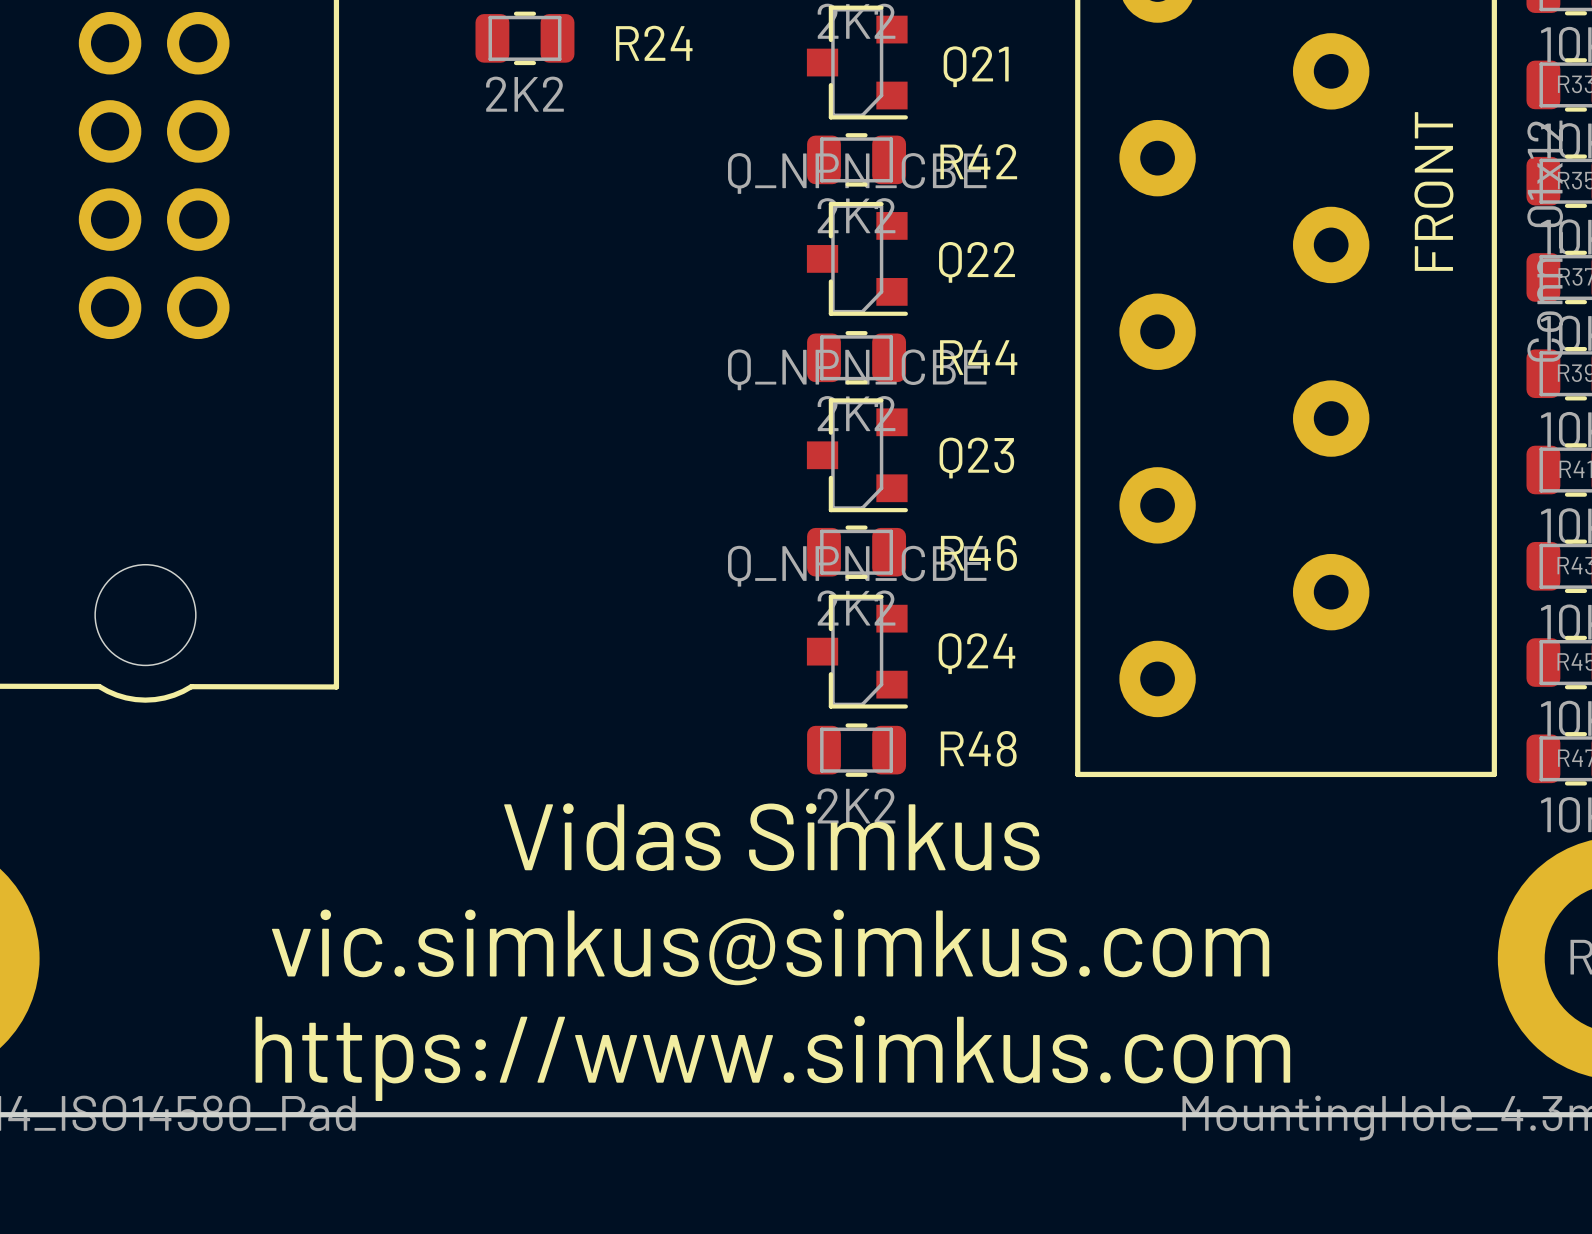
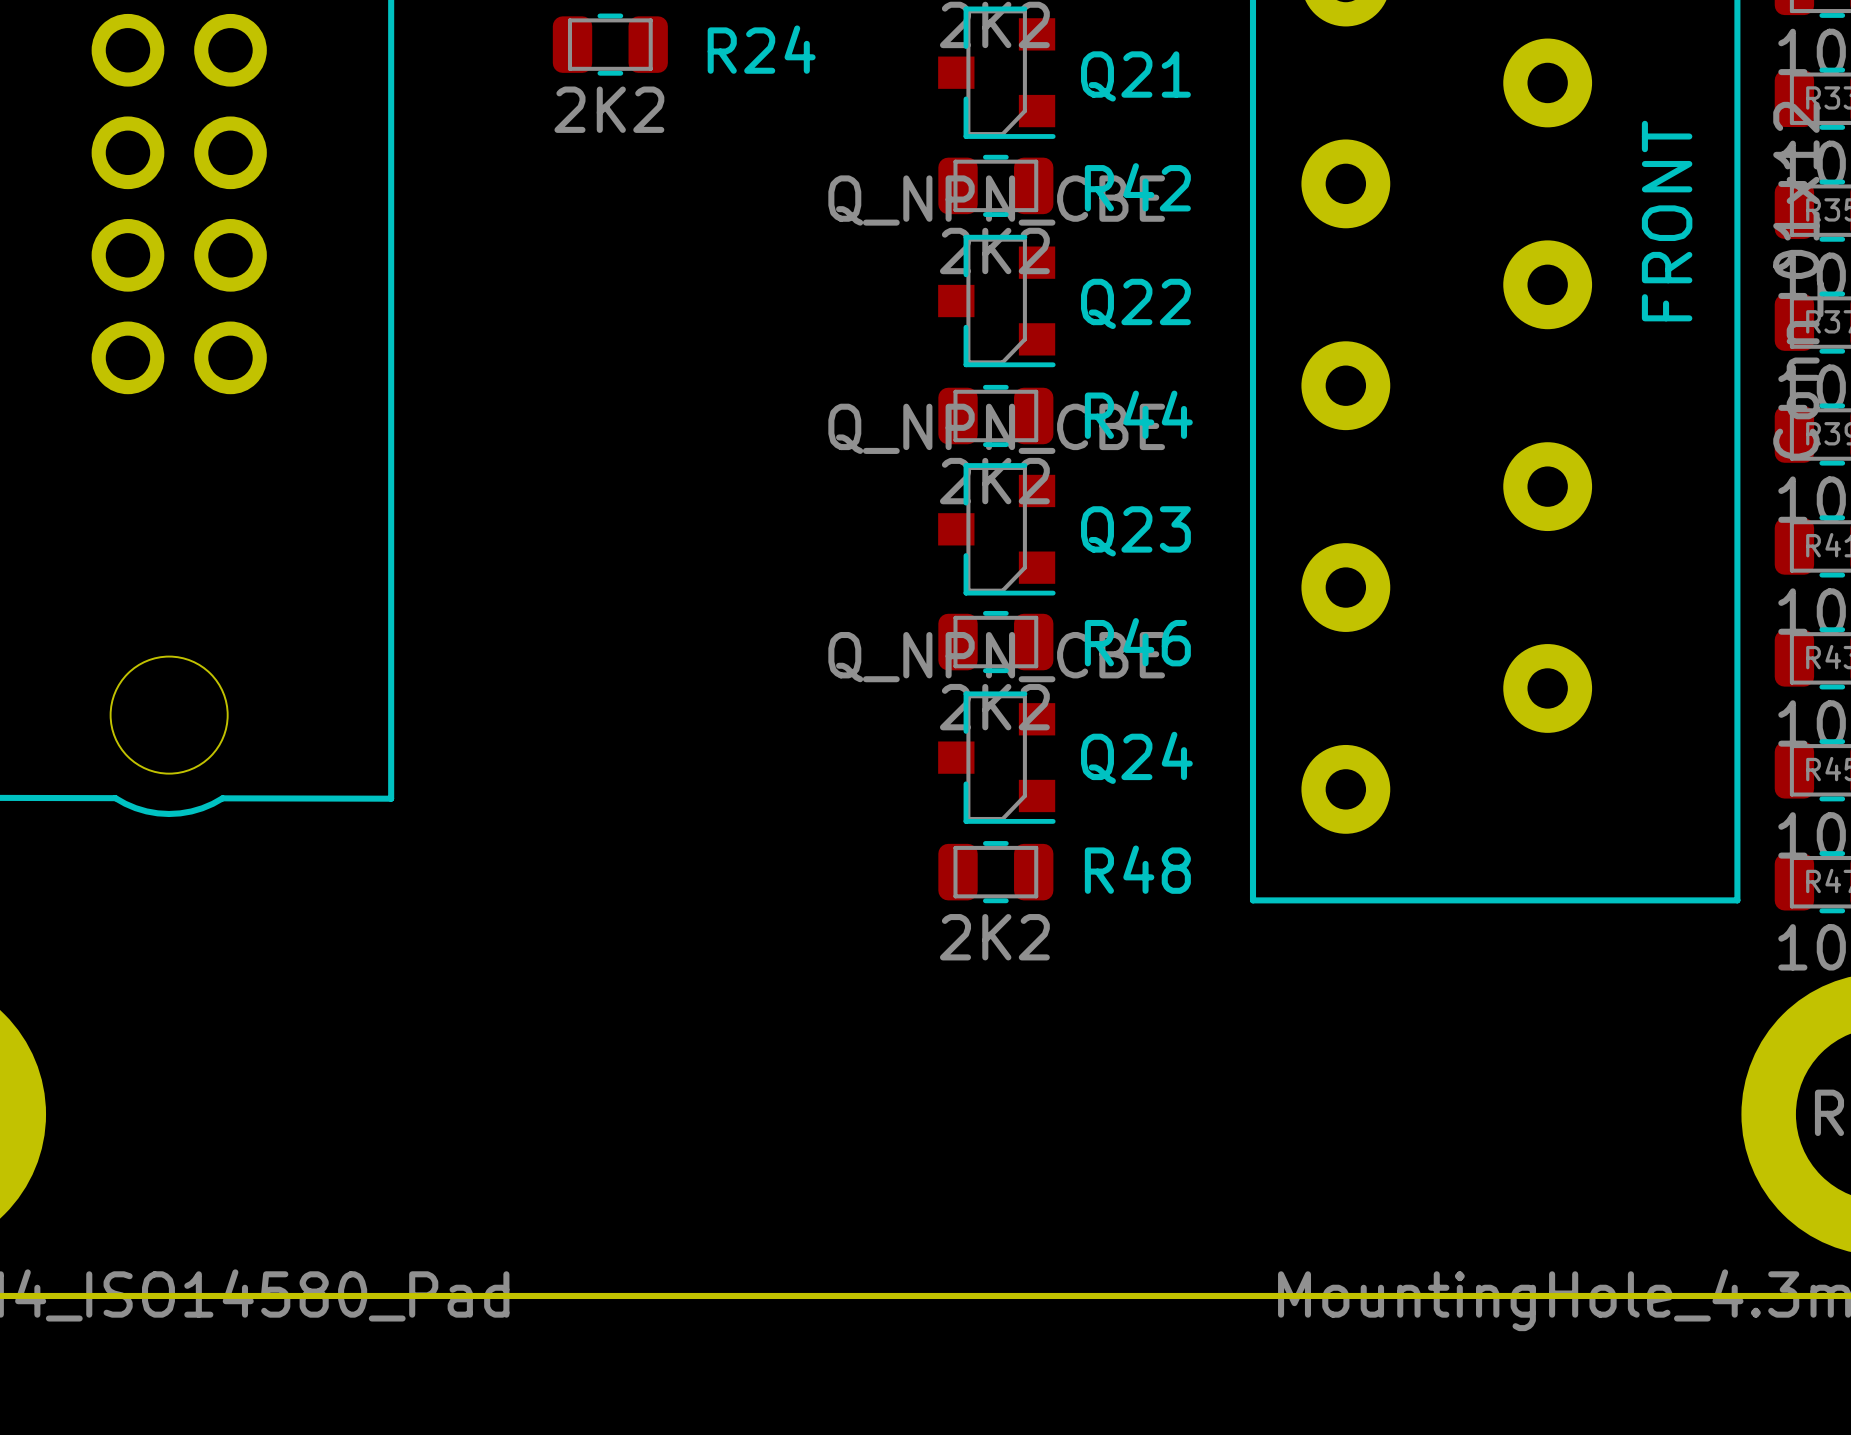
text: Vidas Simkus (771, 837) -> none
text: vic.simkus@simkus.com (770, 947) -> none
text: https://www.simkus.com (772, 1058) -> none

